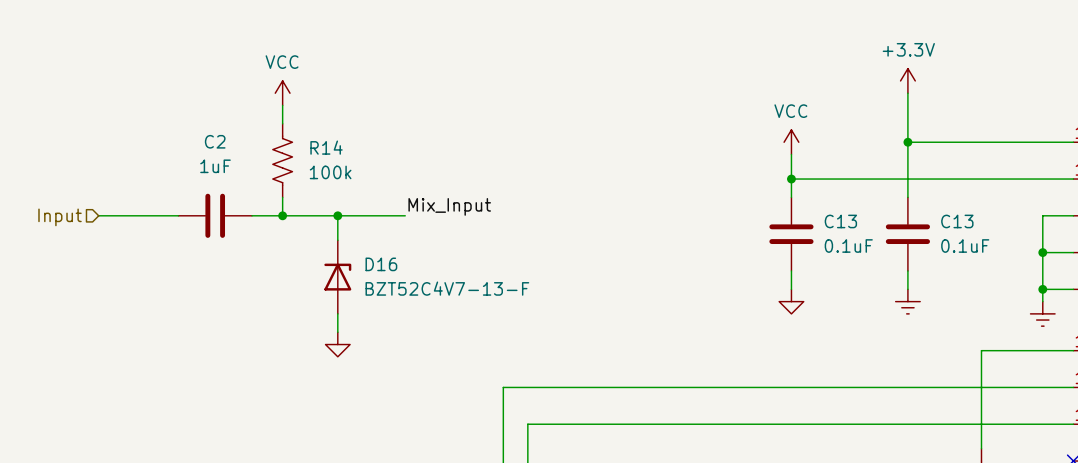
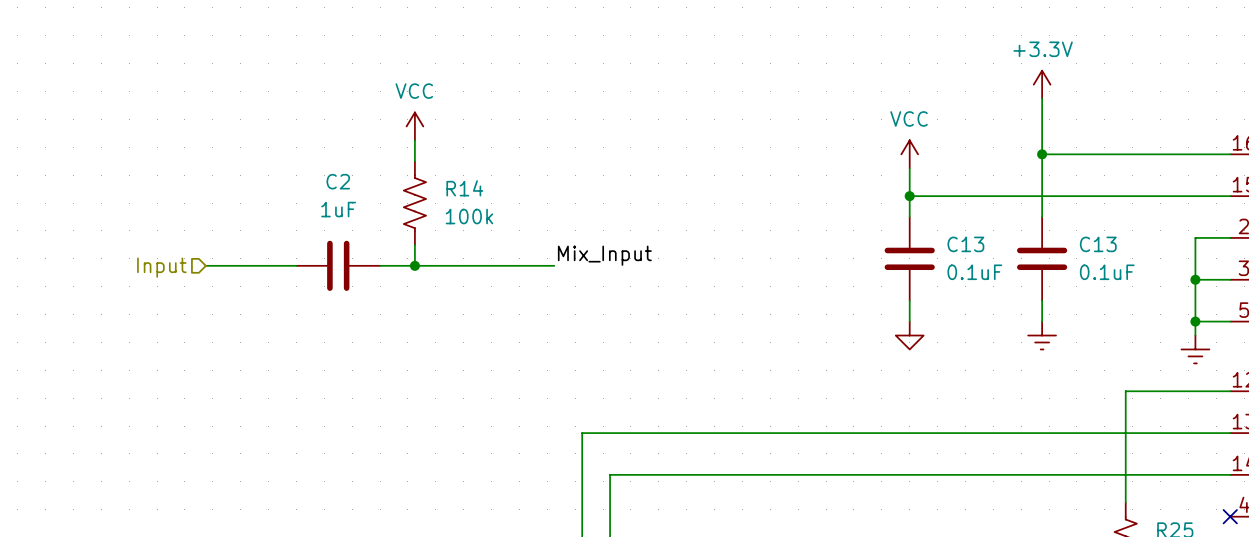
power symbol position: VCC (282, 93) -> VCC (414, 126)
wire: (282, 105) (282, 123) -> (414, 140) (414, 161)
R14 position: (282, 160) -> (414, 203)
wire: (282, 197) (282, 215) -> (414, 244) (414, 265)
label position: Mix_Input (449, 206) -> Mix_Input (604, 255)
wire: (98, 215) (178, 215) -> (205, 265) (296, 265)
C2 position: (215, 215) -> (338, 265)
wire: (251, 215) (405, 215) -> (380, 265) (554, 265)
junction: (282, 215) -> none
wire: (337, 215) (337, 240) -> none
junction position: (337, 215) -> (414, 265)
hierarchical label position: Input (60, 217) -> Input (161, 267)
D16: BZT52C4V7-13-F (337, 277) -> none
wire: (337, 313) (337, 332) -> none
power symbol: (337, 344) -> none

